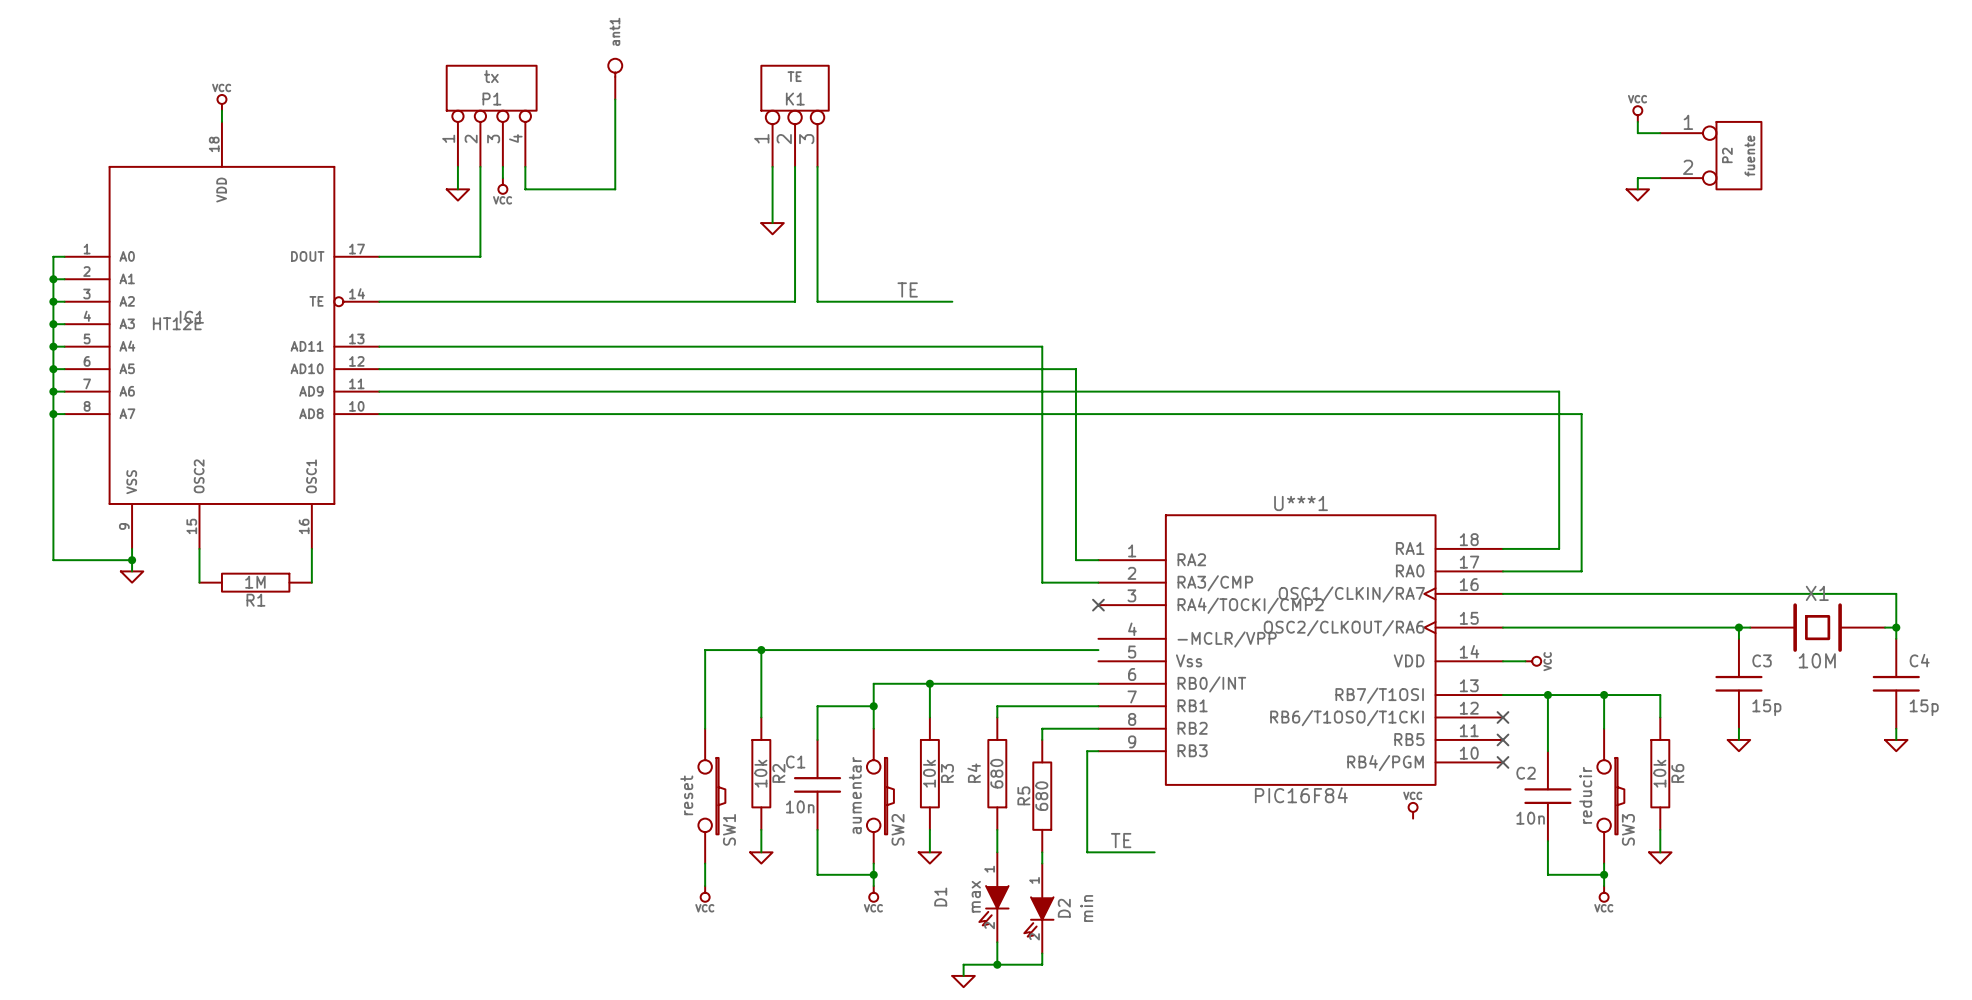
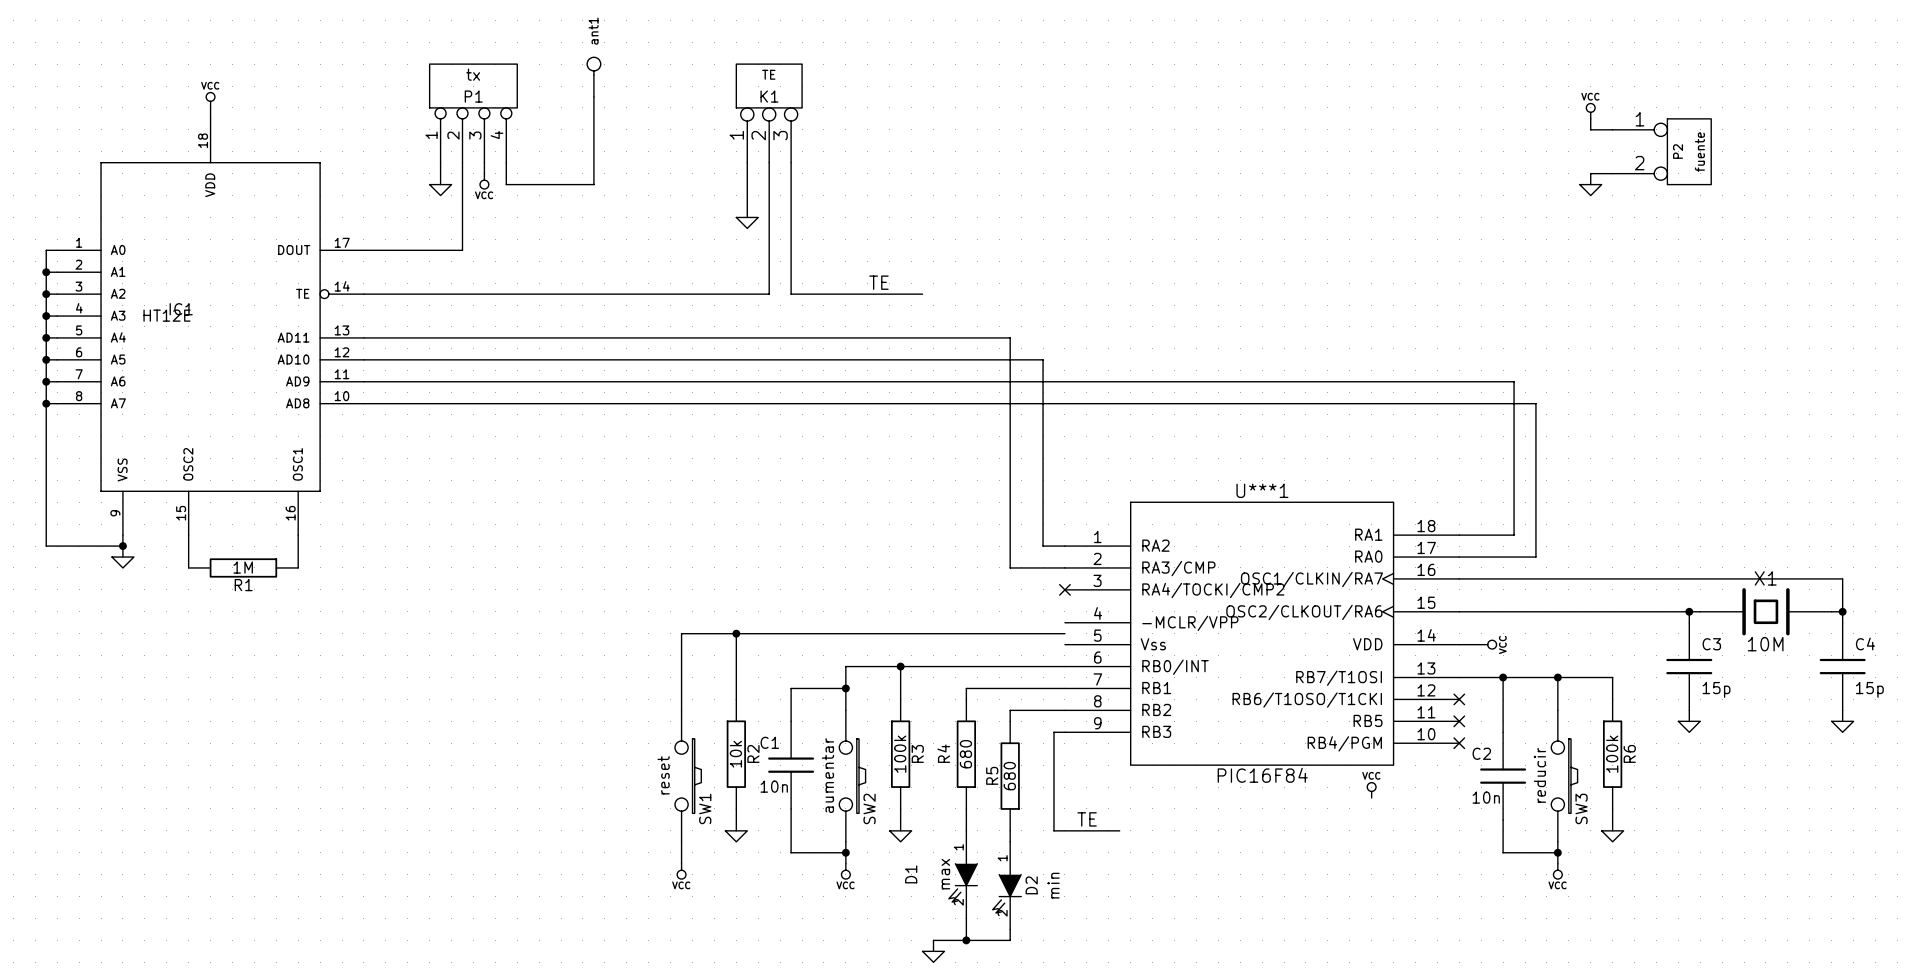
R3 value: 10k (929, 773) -> 100k (900, 754)
R6 value: 10k (1659, 773) -> 100k (1612, 754)

